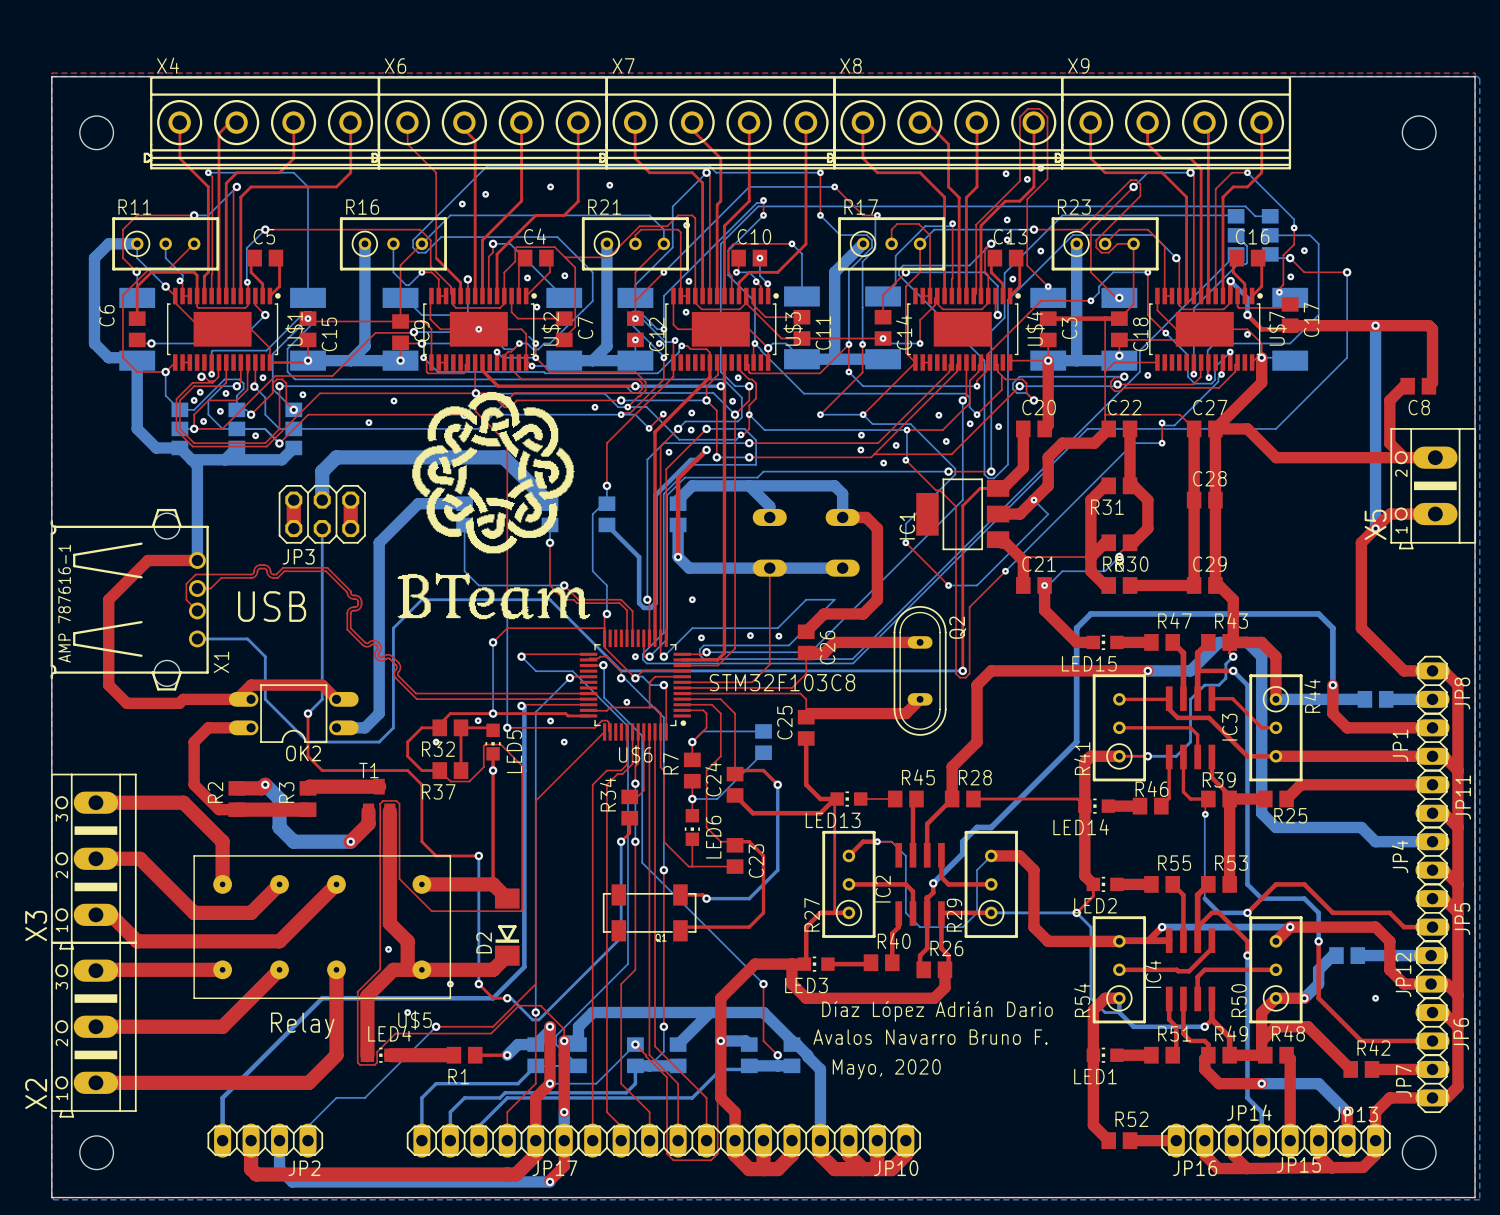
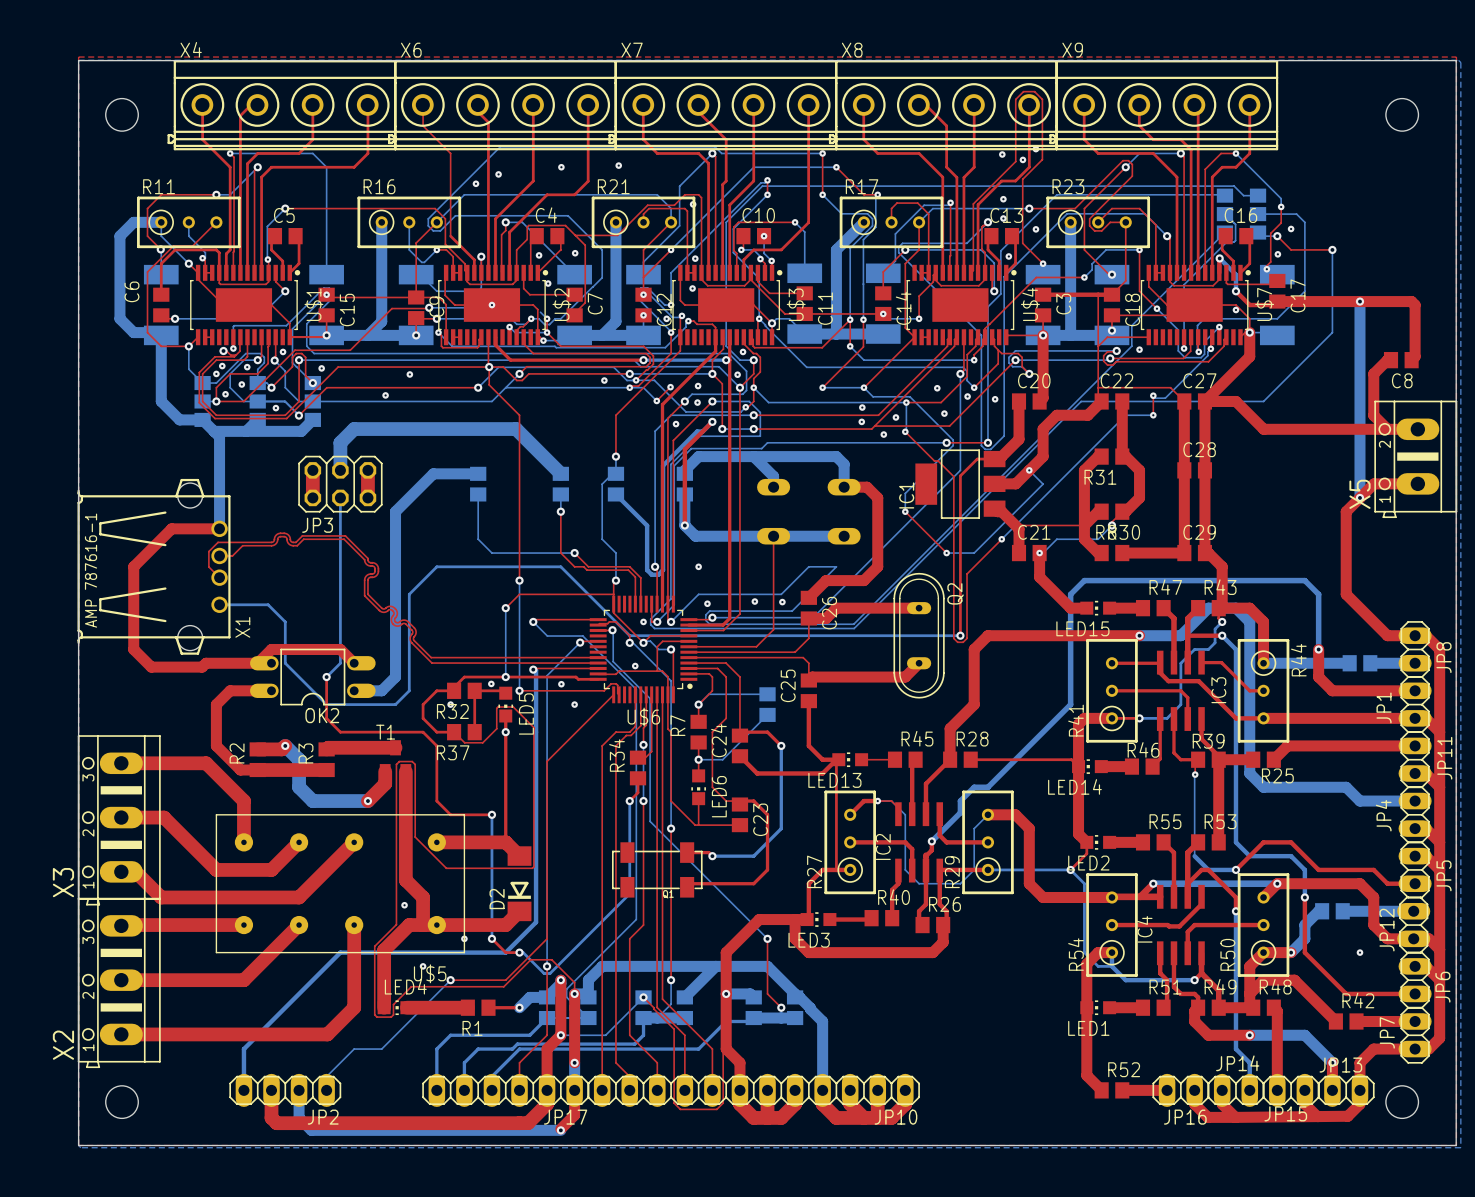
drawing: [412, 391, 575, 554] -> none
drawing: [397, 572, 591, 620] -> none
text: USB (272, 606) -> none
text: STM32F103C8 (782, 682) -> none
text: Díaz López Adrián Dario (937, 1011) -> none
text: Relay (302, 1025) -> none
text: Avalos Navarro Bruno F. (930, 1037) -> none
text: Mayo, 2020 (886, 1069) -> none

